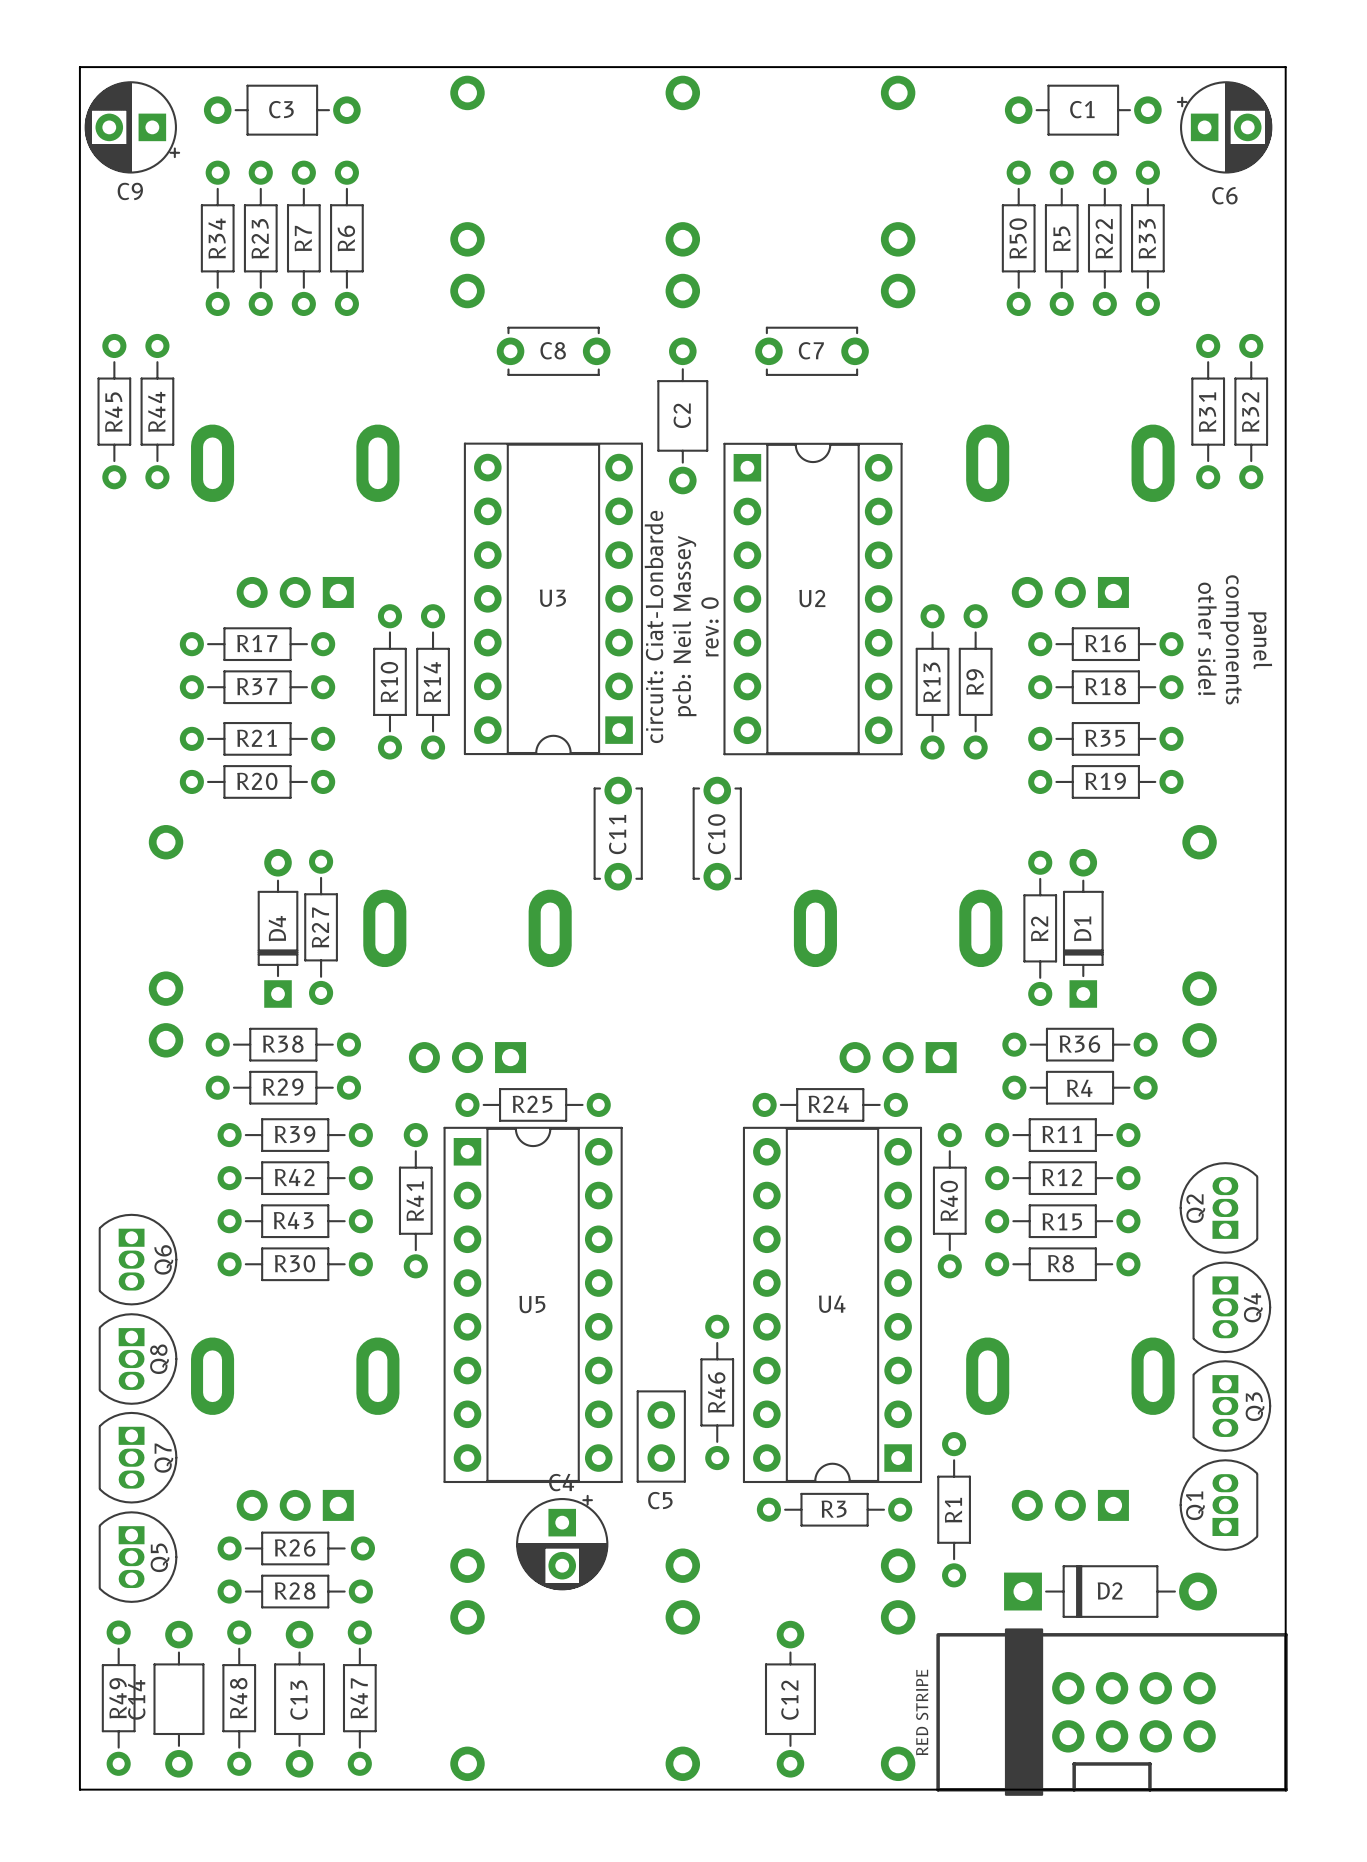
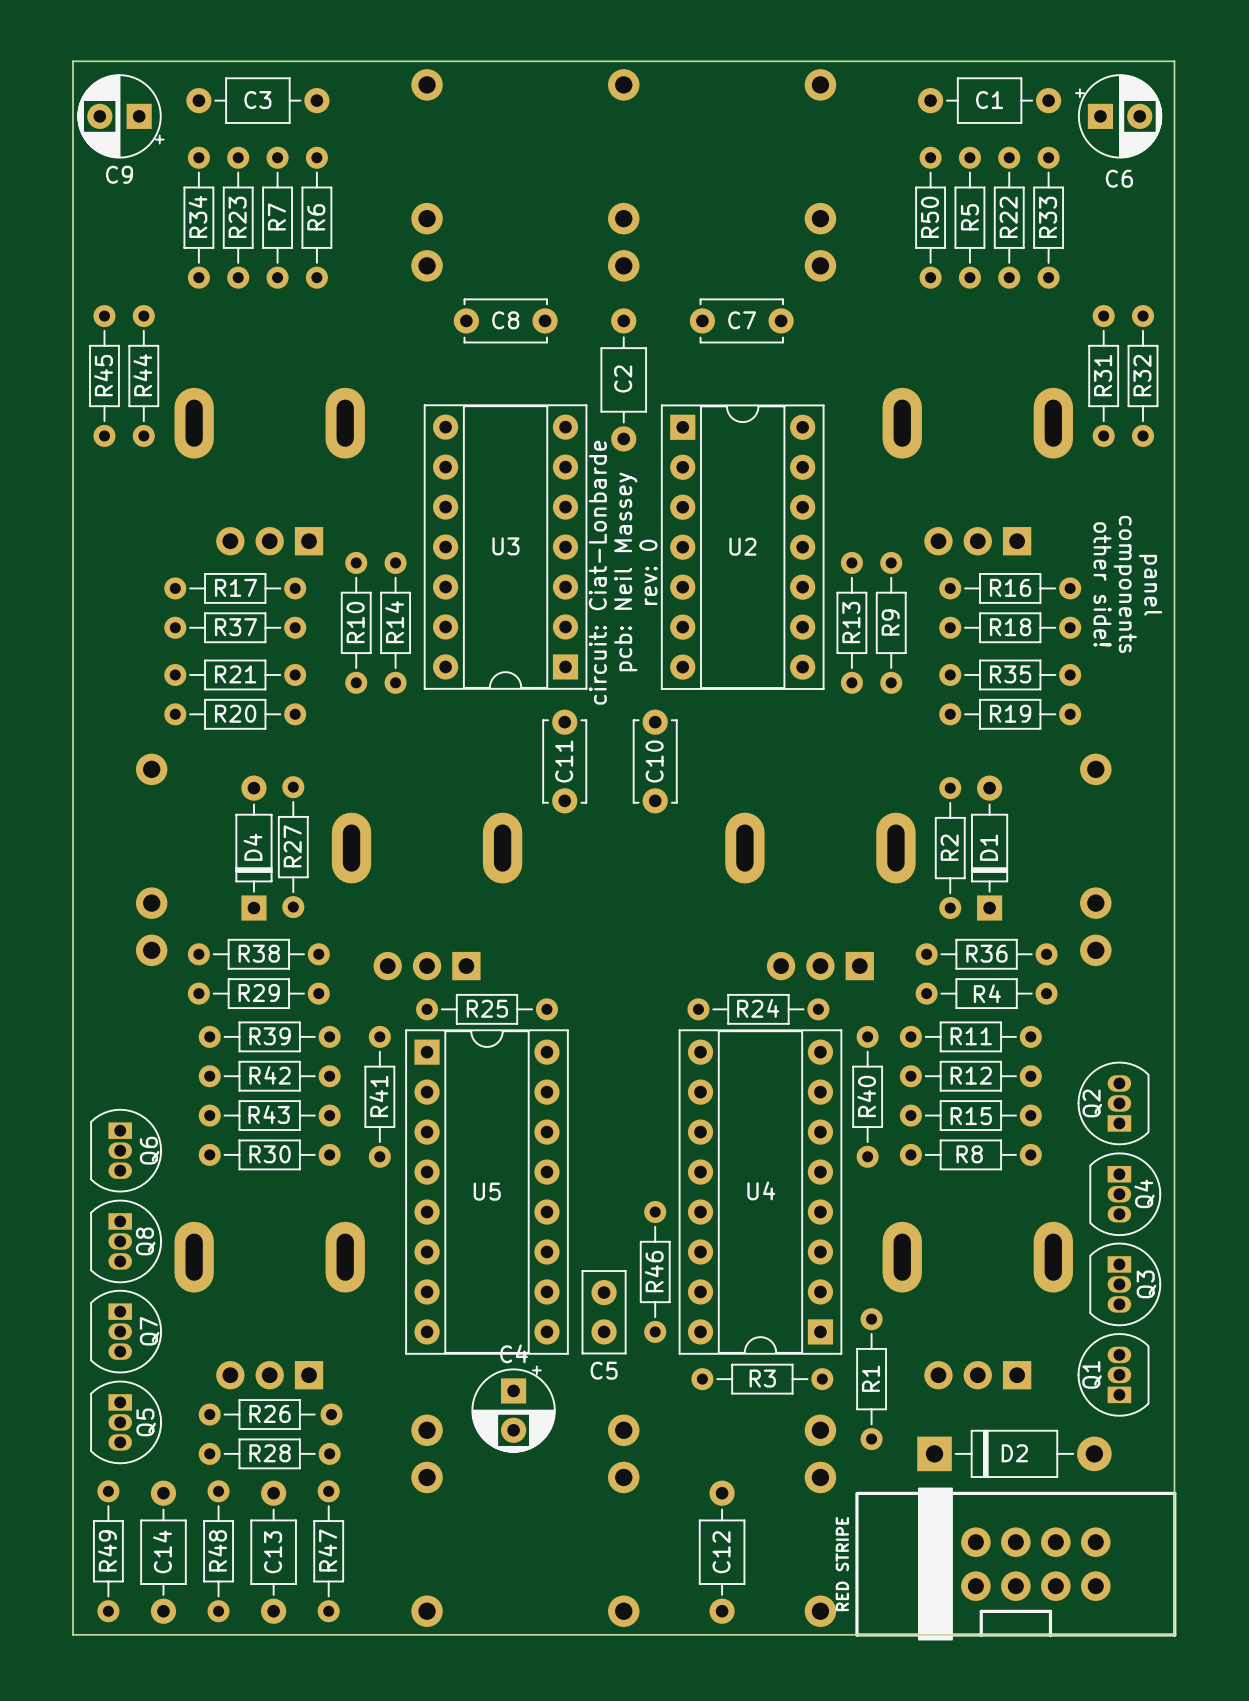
C14 name position: C14 (136, 1699) -> C14 (162, 1551)

